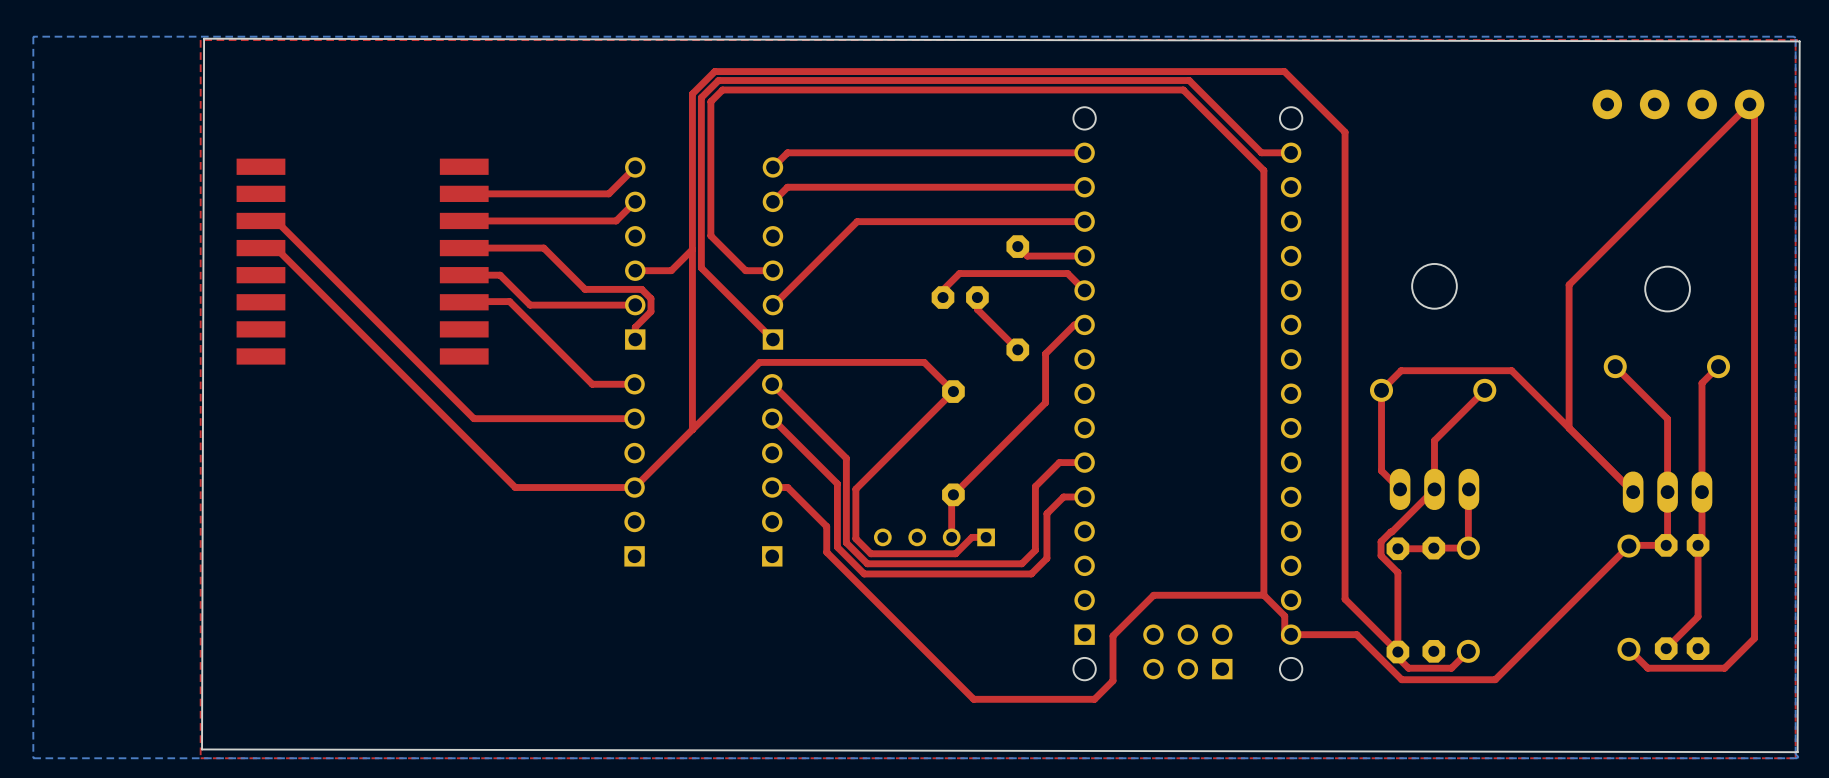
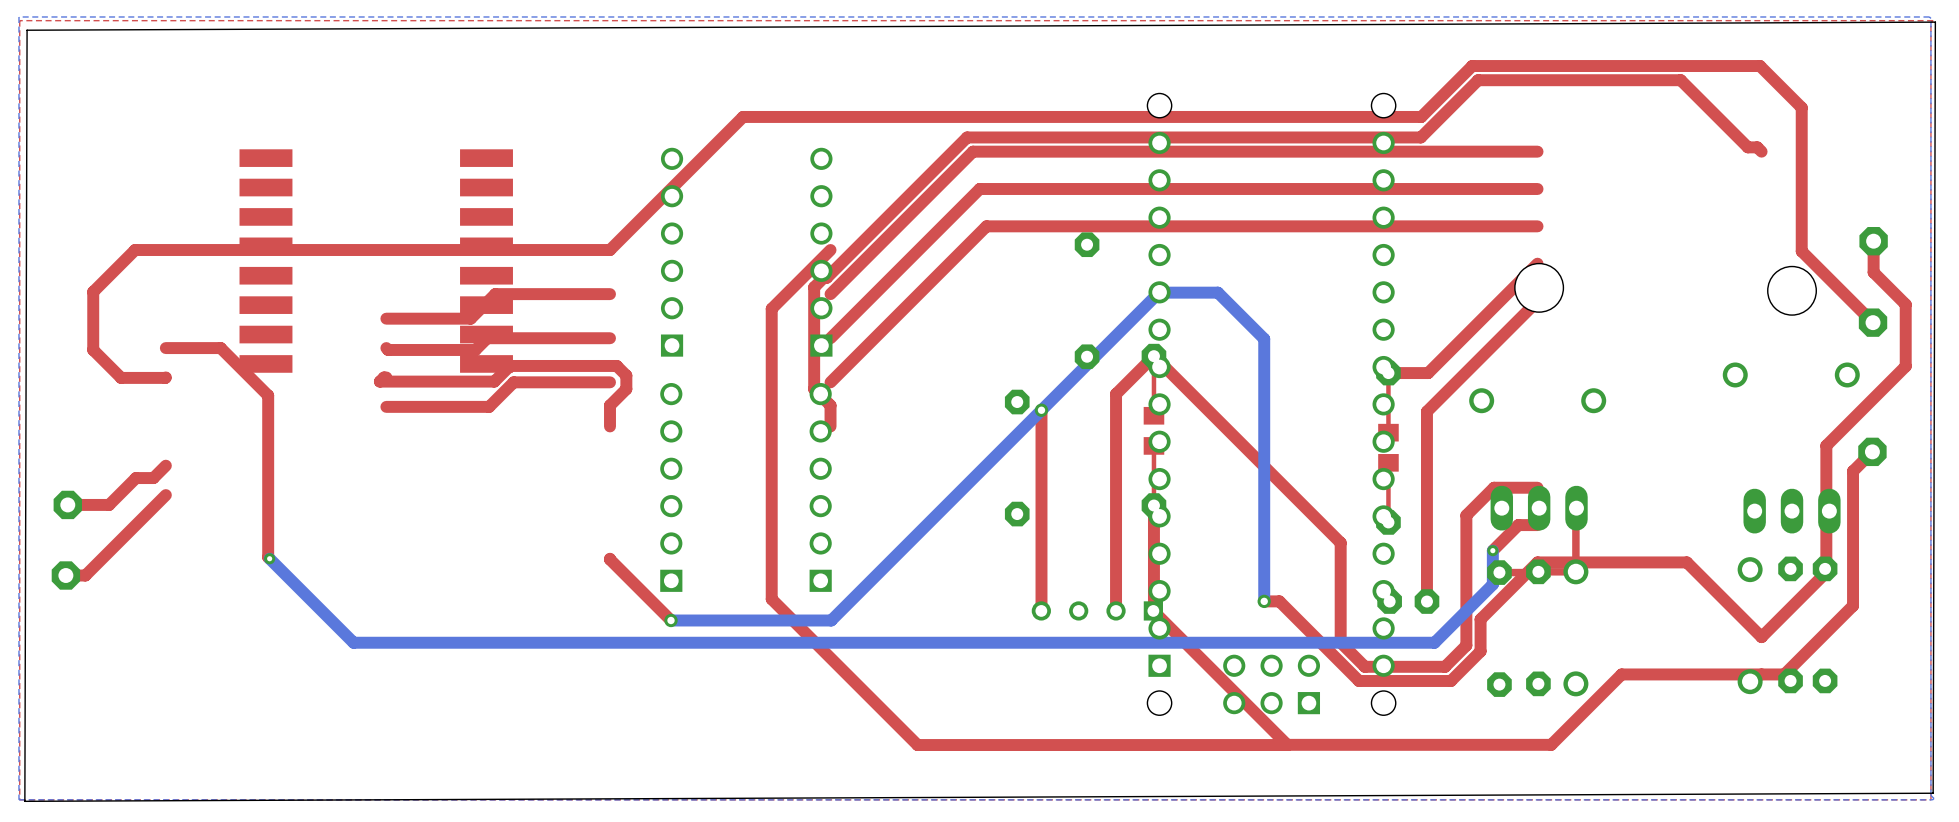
top zone outline: (200, 40) (200, 758) -> (200, 20) (19, 20) (19, 799) (200, 799)
board edge: (1799, 41) (204, 38) (202, 749) (1797, 752) -> (1935, 22) (27, 30) (24, 801) (1933, 793)
part: (1678, 104) -> none
top track: (1084, 152) (787, 152) (772, 167) -> none
top track: (1291, 152) (1261, 152) (1189, 80) (718, 80) (701, 97) (701, 267) (772, 339) -> none
top track: none -> (1537, 151) (972, 151) (830, 294)
top track: none -> (1761, 151) (1757, 147) (1747, 147) (1680, 80) (1478, 80) (1420, 137) (967, 137) (826, 277) (823, 277) (814, 287) (814, 389) (830, 405) (830, 426)
top track: (635, 167) (608, 193) (464, 193) -> none
top track: (1084, 187) (787, 187) (772, 201) -> none
top track: none -> (1537, 189) (979, 189) (830, 338)
top track: (635, 201) (616, 220) (464, 220) -> none
top track: (276, 220) (473, 418) (634, 418) -> none
top track: (1084, 221) (857, 221) (772, 305) -> none
top track: none -> (1537, 226) (986, 226) (830, 382)
top track: none -> (1873, 241) (1873, 272) (1905, 304) (1905, 366) (1826, 445) (1826, 572) (1761, 637) (1686, 562) (1537, 562) (1480, 619) (1480, 651) (1450, 680) (1359, 680) (1279, 601) (1264, 601)
part: none -> (1873, 241)
top track: (1017, 246) (1027, 256) (1084, 256) -> none
top track: (260, 248) (274, 246) (515, 487) (634, 487) (759, 362) (924, 362) (953, 391) (855, 489) (855, 538) (870, 553) (955, 553) (971, 537) (986, 537) -> none
top track: (464, 248) (543, 248) (585, 289) (641, 289) (650, 298) (650, 311) (635, 327) (635, 339) -> none
top track: (692, 249) (671, 270) (635, 270) -> none
top track: none -> (830, 250) (771, 308) (771, 599) (917, 745) (1287, 745) (1153, 610) (1153, 506)
top track: none -> (1537, 263) (1428, 373) (1388, 373)
top track: (772, 270) (745, 270) (710, 235) (710, 101) (722, 89) (1183, 89) (1263, 170) (1263, 595) -> none
top track: (464, 275) (500, 275) (530, 305) (635, 305) -> none
top track: (1084, 290) (1067, 273) (959, 273) (943, 290) (943, 297) -> none
top track: none -> (610, 294) (495, 294) (470, 318) (386, 318)
part: (960, 297) -> none
top track: (977, 297) (977, 309) (1017, 349) -> none
top track: none -> (1537, 301) (1426, 411) (1426, 601)
top track: (464, 302) (456, 301) (509, 301) (592, 384) (634, 384) -> none
top track: none -> (1873, 322) (1801, 251) (1801, 107) (1760, 66) (1472, 66) (1421, 116) (743, 116) (610, 250) (135, 250) (93, 291) (93, 349) (121, 377) (165, 377)
part: none -> (1873, 322)
top track: (1084, 324) (1074, 324) (1045, 353) (1045, 402) (951, 496) (951, 537) -> none
top track: none -> (610, 338) (487, 338) (475, 349) (388, 349) (386, 348)
top track: none -> (165, 348) (220, 348) (268, 395) (269, 558)
top track: (1615, 366) (1667, 418) (1666, 545) (1629, 545) (1495, 679) (1401, 679) (1356, 634) (1289, 633) -> none
top track: (1718, 366) (1701, 383) (1701, 541) (1698, 545) (1698, 616) (1666, 648) -> none
top track: none -> (386, 377) (379, 381) (494, 381) (509, 365) (616, 365) (626, 375) (626, 389) (610, 405) (610, 426)
top track: none -> (610, 382) (513, 382) (489, 406) (386, 406)
top track: (772, 384) (846, 458) (846, 542) (867, 563) (1021, 563) (1035, 550) (1035, 486) (1059, 462) (1084, 462) -> none
top track: (1484, 390) (1434, 440) (1434, 489) (1381, 541) (1381, 555) (1397, 572) (1397, 657) (1408, 668) (1451, 668) (1468, 651) -> none
top track: none -> (1041, 410) (1041, 610)
via: none -> (1041, 410)
top track: (772, 418) (837, 483) (837, 547) (864, 573) (1031, 573) (1046, 558) (1046, 513) (1063, 497) (1084, 497) -> none
part: none -> (1153, 430)
top track: (1569, 428) (1569, 284) (1749, 104) (1754, 109) (1754, 638) (1724, 668) (1647, 668) (1628, 649) -> none
top track: (692, 429) (692, 93) (714, 71) (1284, 71) (1345, 132) (1345, 599) (1397, 652) -> none
part: none -> (1388, 447)
top track: none -> (1872, 451) (1853, 471) (1853, 605) (1784, 674) (1621, 674) (1551, 744) (1287, 744)
part: none -> (1872, 451)
top track: none -> (165, 465) (153, 478) (135, 478) (109, 504) (67, 504)
top track: none -> (1537, 487) (1494, 487) (1466, 515) (1466, 645) (1445, 666) (1364, 666) (1340, 642) (1340, 542) (1153, 356) (1116, 394) (1116, 610)
top track: none -> (165, 495) (85, 575) (65, 575)
part: none -> (67, 504)
top track: (772, 487) (787, 487) (826, 526) (826, 552) (973, 699) (1094, 699) (1113, 680) (1113, 635) (1153, 595) (1263, 595) -> none
top track: (1400, 489) (1381, 470) (1381, 390) (1401, 370) (1511, 370) (1633, 492) -> none
top track: none -> (1537, 525) (1518, 525) (1492, 550)
bottom track: none -> (1492, 550) (1492, 584) (1434, 642) (353, 642) (269, 558)
via: none -> (1492, 550)
via: none -> (269, 558)
top track: none -> (610, 558) (671, 620)
part position: (934, 537) -> (1097, 610)
part: none -> (65, 575)
bottom track: none -> (1264, 601) (1264, 338) (1217, 292) (1159, 292) (831, 620) (671, 620)
via: none -> (1264, 601)
part: none -> (1408, 601)
via: none -> (671, 620)
top track: (1263, 595) (1284, 616) (1284, 638) (1293, 638) (1297, 634) -> none

